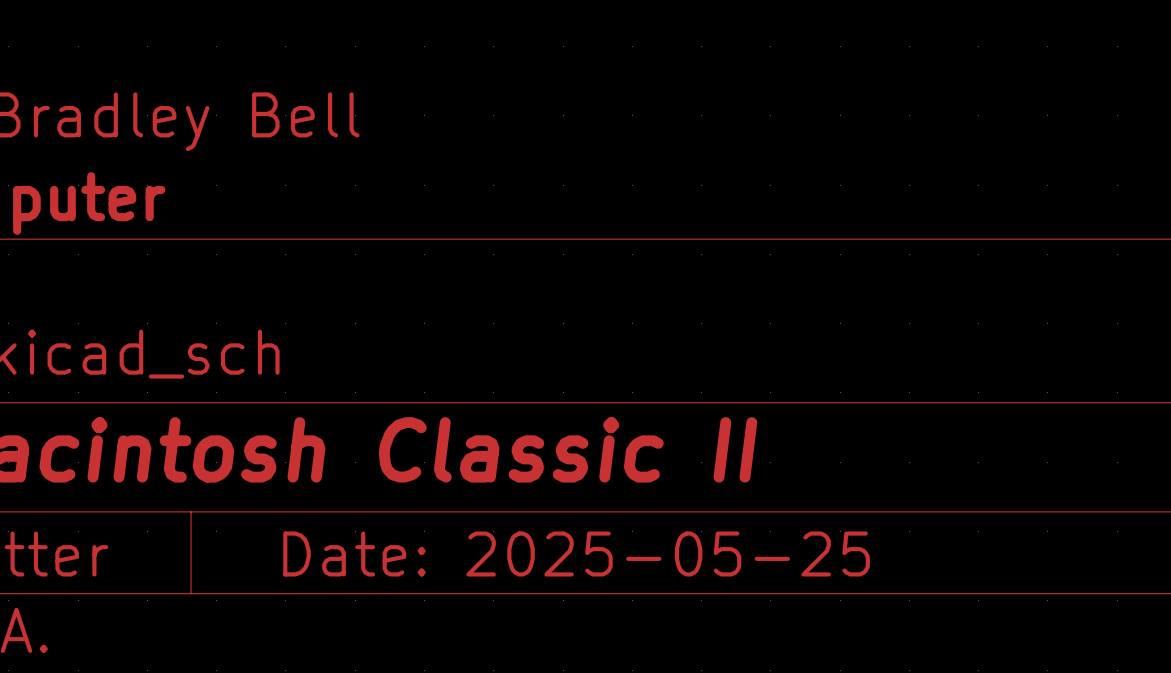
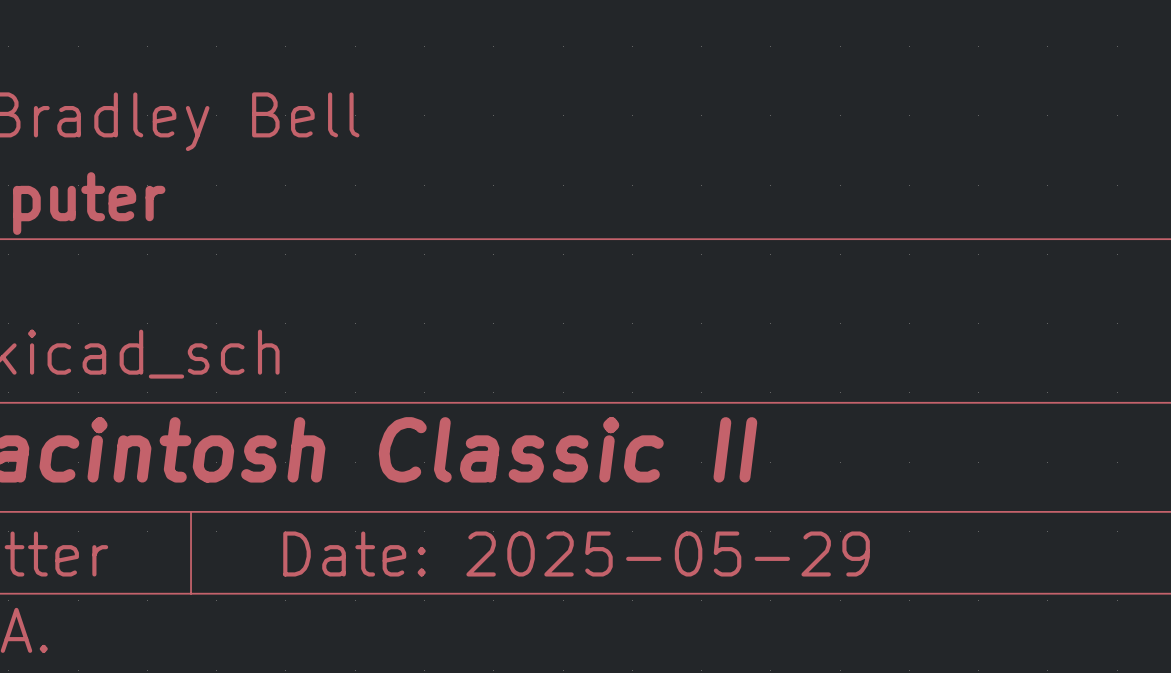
title block: Date: 2025-05-25 (576, 554) -> Date: 2025-05-29 (576, 554)

